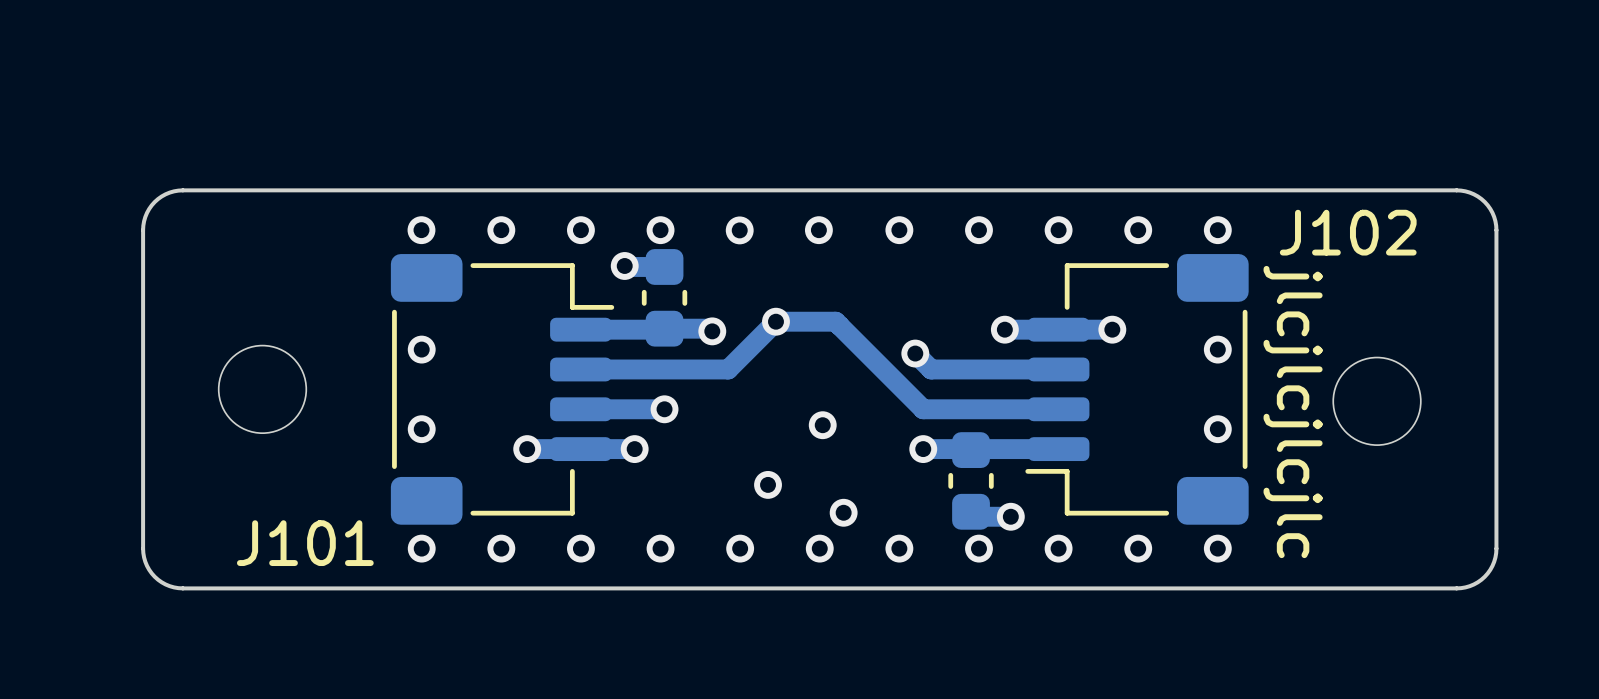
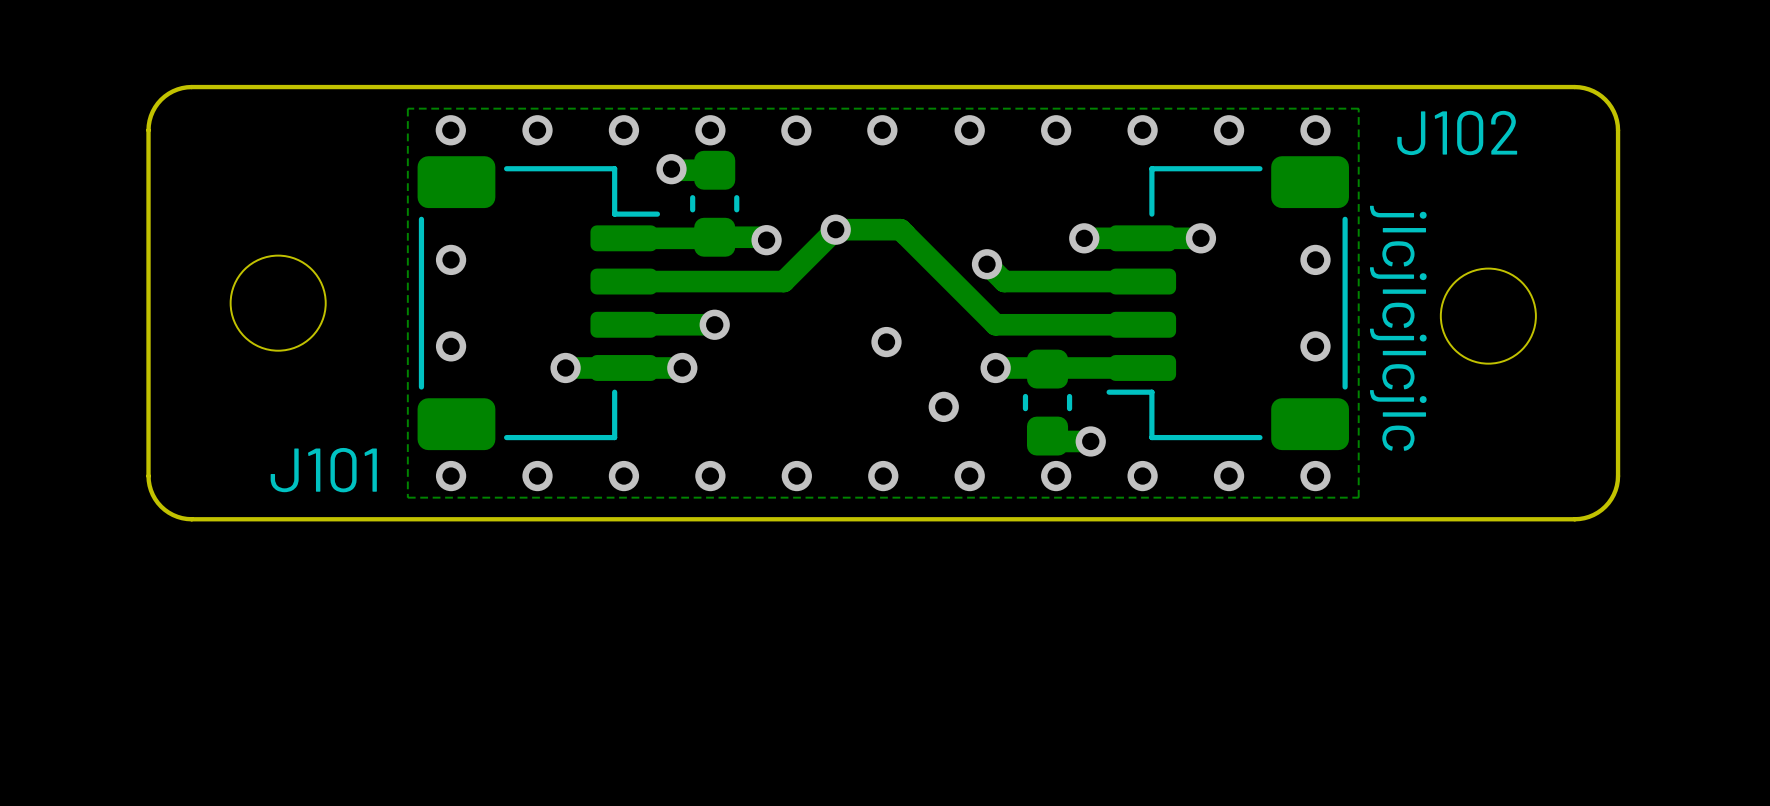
zone outline: none -> (1358, 108) (1358, 497) (407, 497) (407, 108) (1358, 108)
via: (768, 484) -> none
via position: (843, 512) -> (943, 406)

